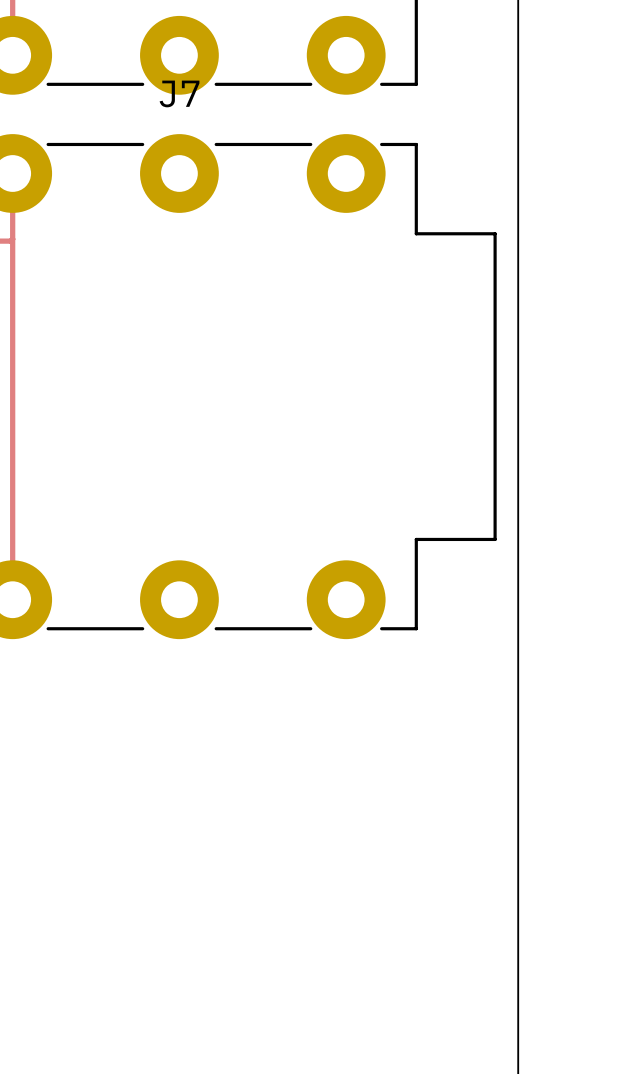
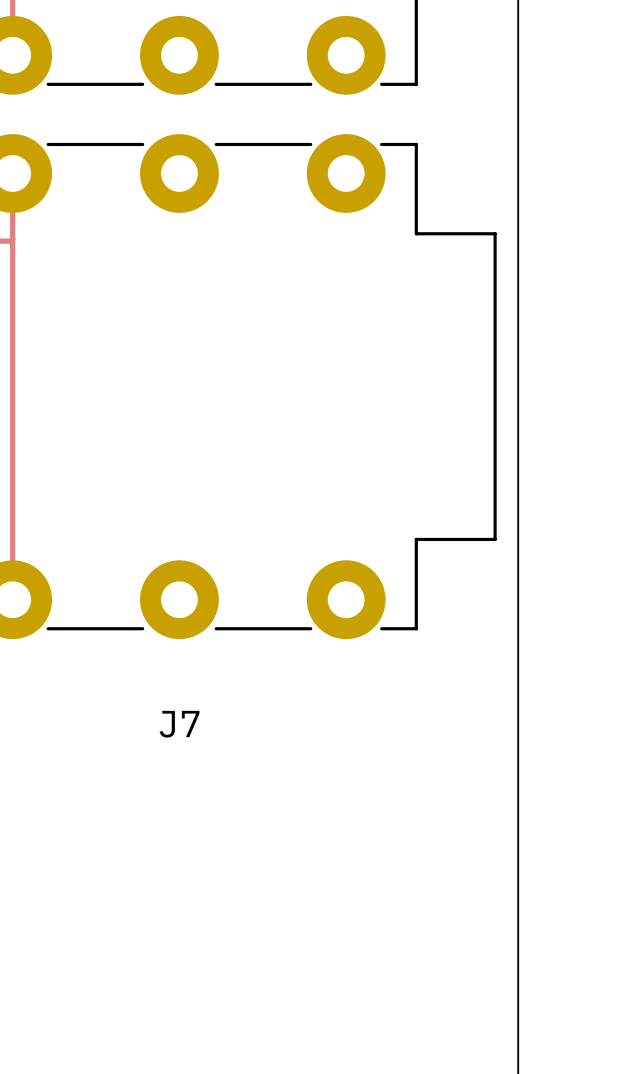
J7 name position: J7 (179, 93) -> J7 (179, 724)

